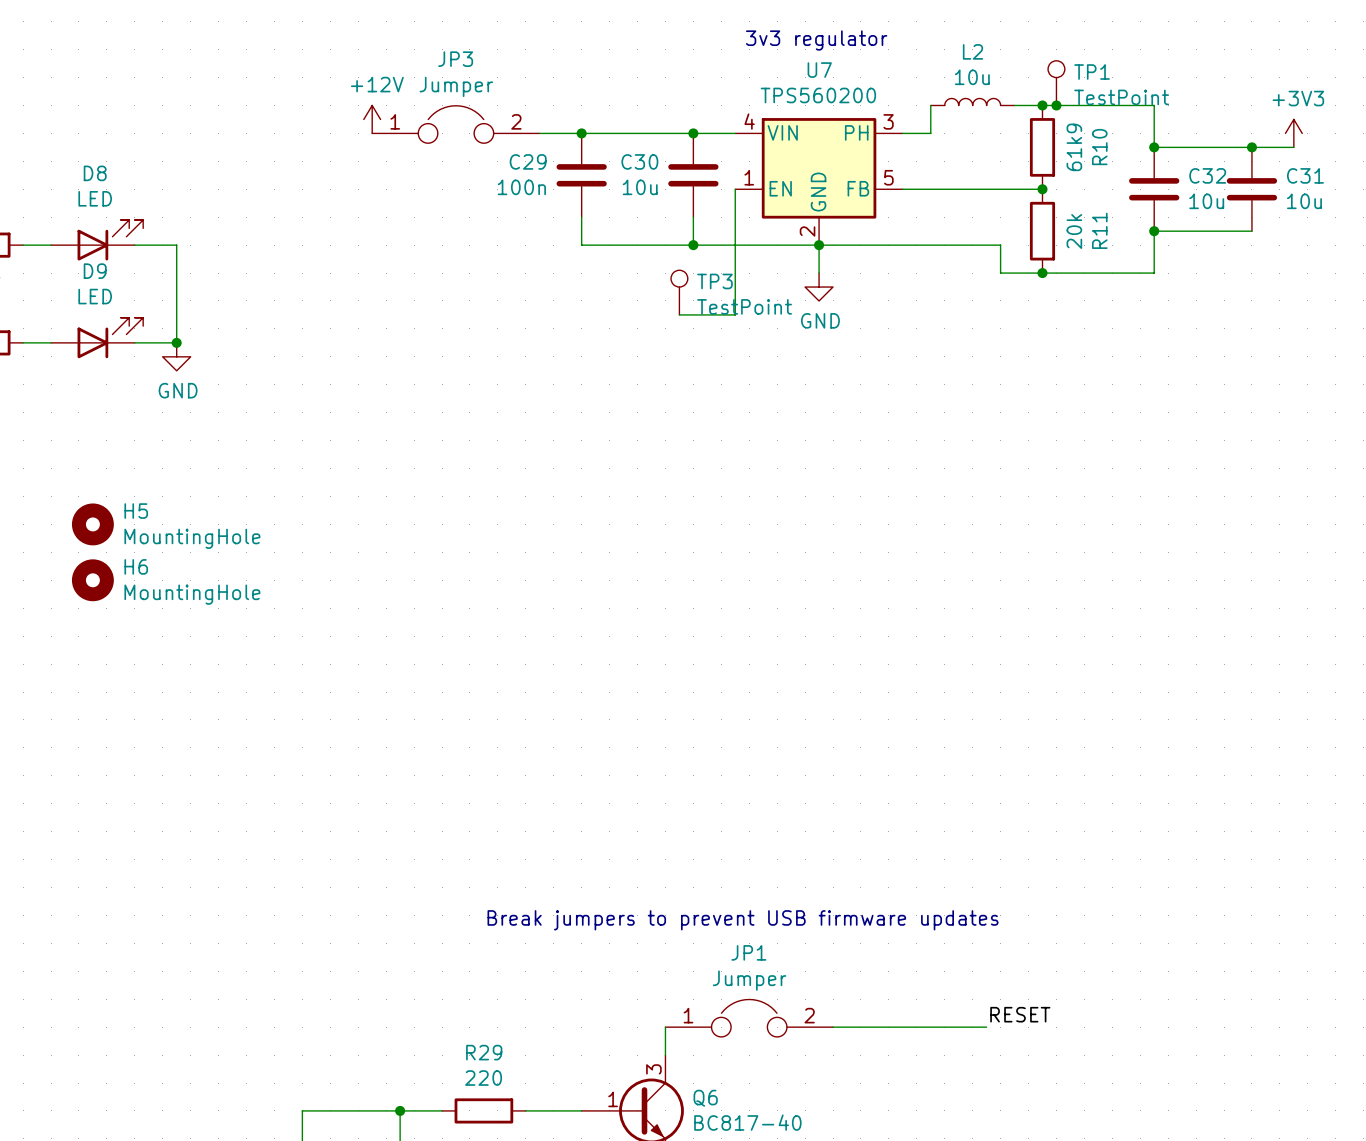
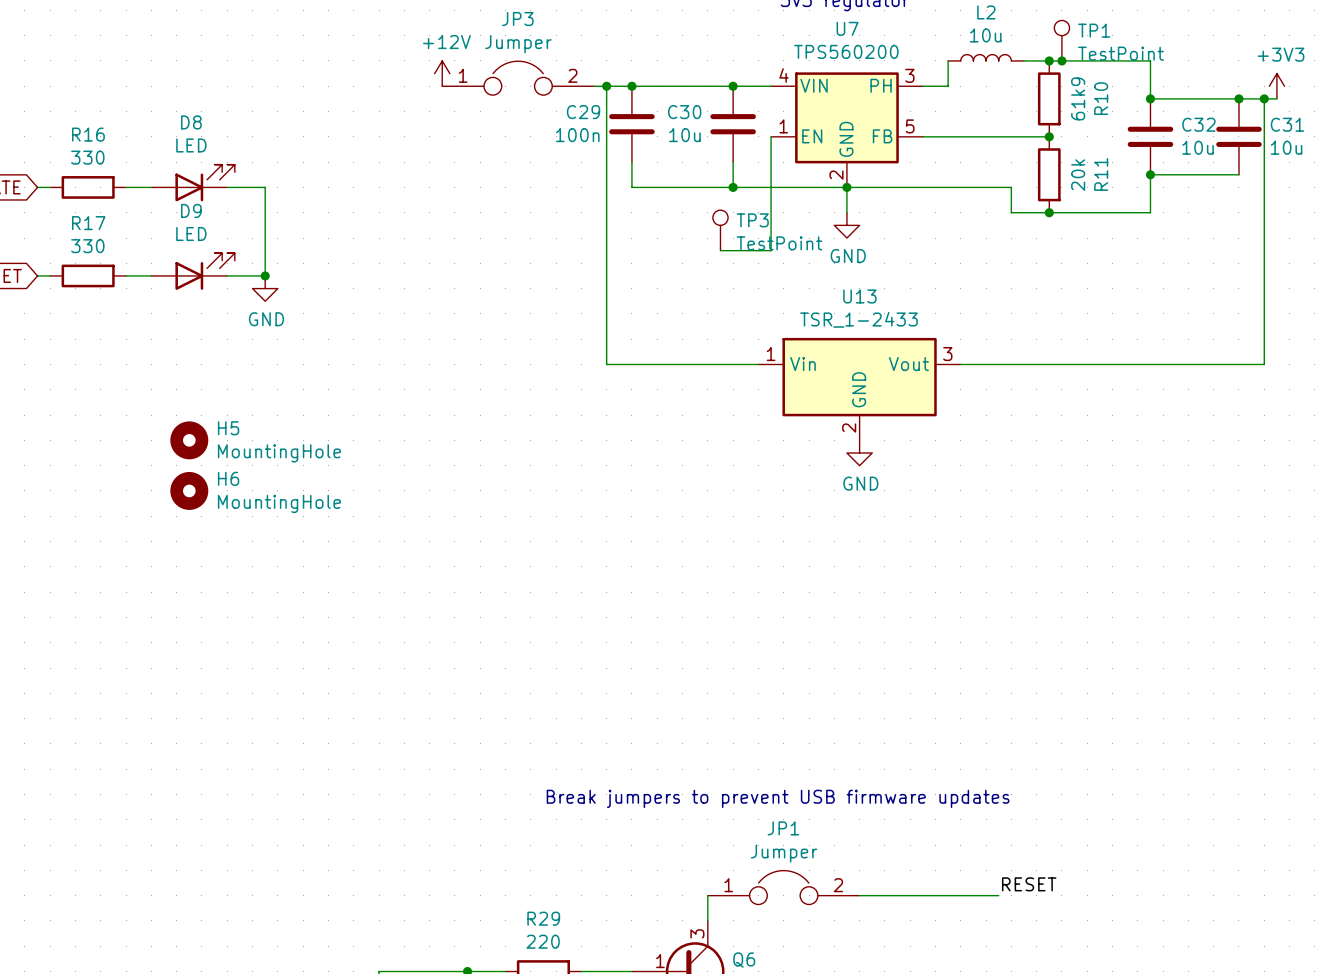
wire: none -> (606, 86) (606, 364) (758, 364)
junction: none -> (606, 86)
wire: none -> (1264, 98) (1264, 364) (960, 364)
junction: none -> (1264, 98)
U13: none -> TSR_1-2433 (859, 389)
power symbol: none -> GND (859, 453)

